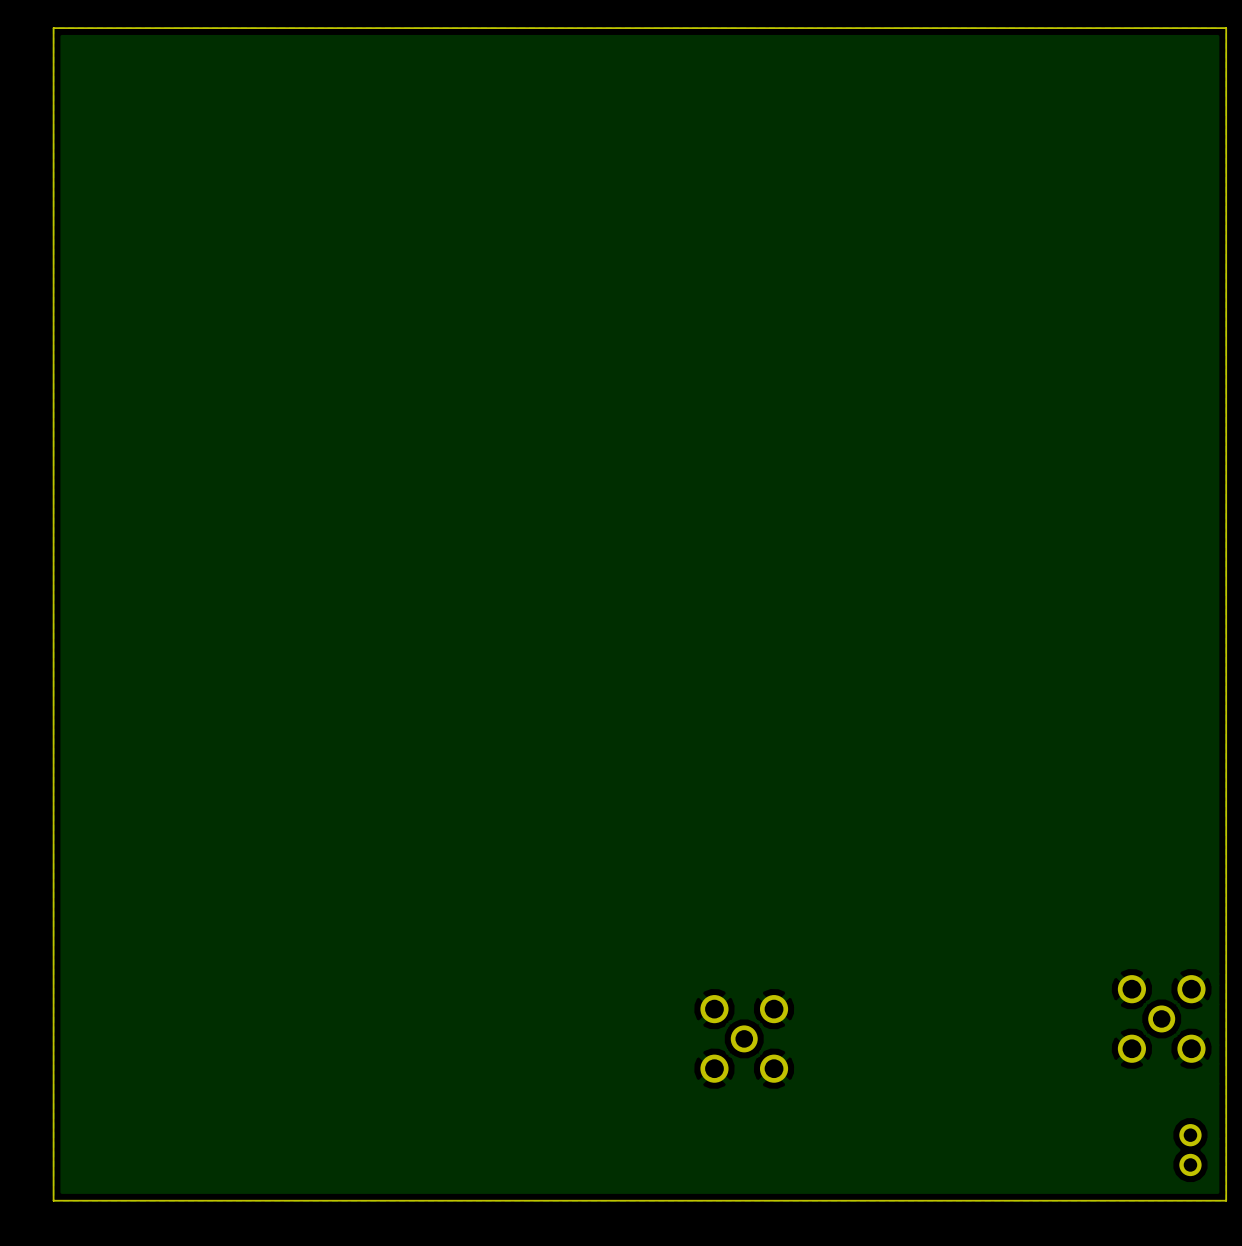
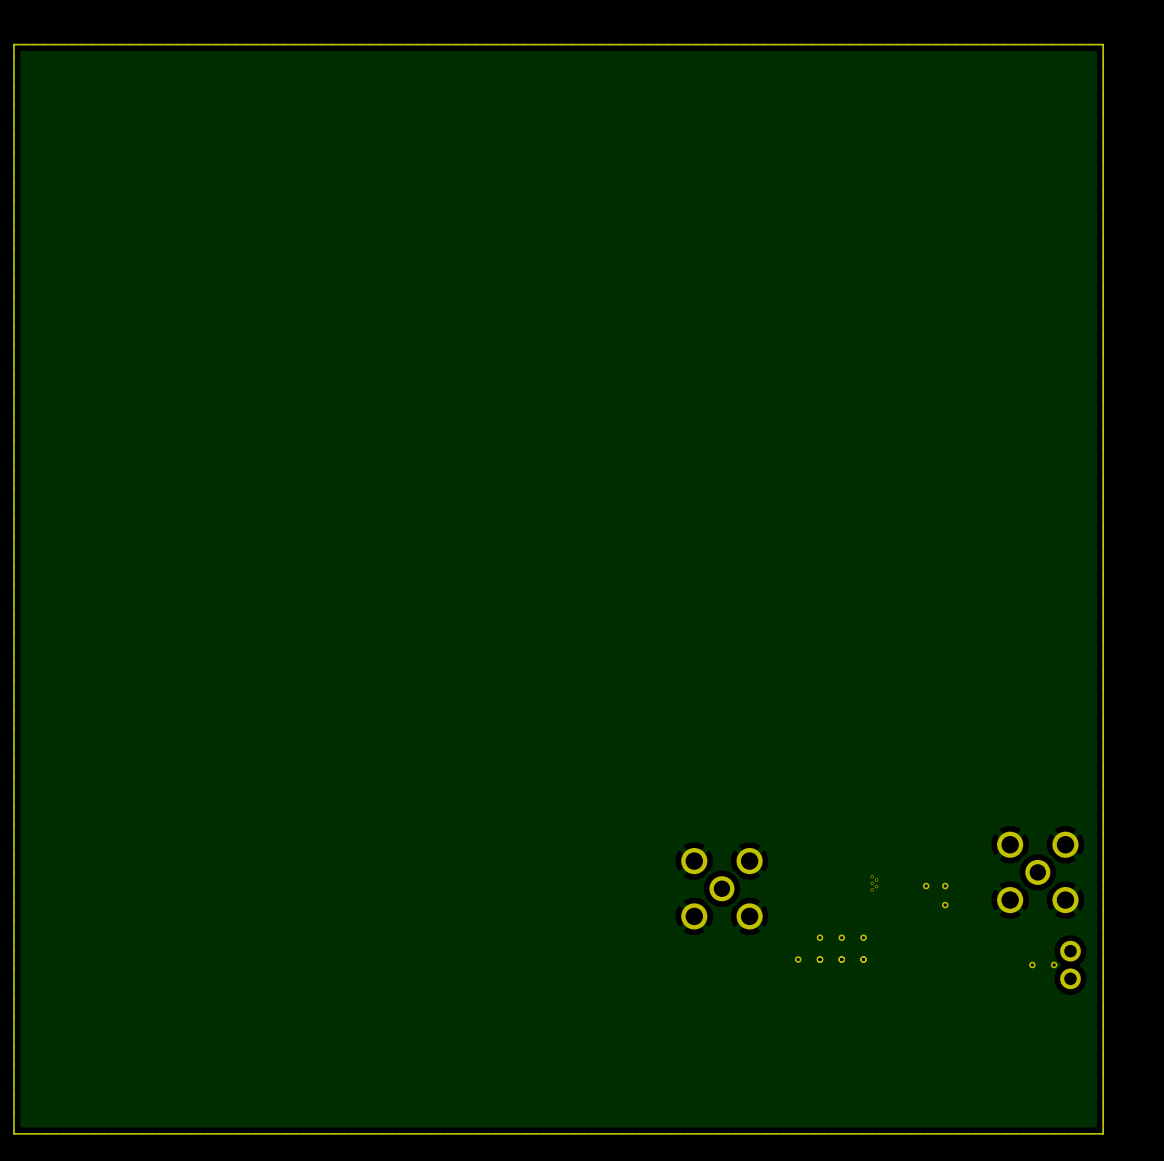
part: none -> (874, 883)
part: none -> (926, 886)
part: none -> (945, 886)
part: none -> (945, 905)
part: none -> (819, 937)
part: none -> (841, 937)
part: none -> (863, 937)
part: none -> (798, 959)
part: none -> (819, 959)
part: none -> (841, 959)
part: none -> (863, 959)
part: none -> (1032, 964)
part position: (1161, 1018) -> (1037, 872)
part: none -> (1054, 964)
part position: (744, 1038) -> (721, 888)
part position: (1190, 1150) -> (1070, 964)

